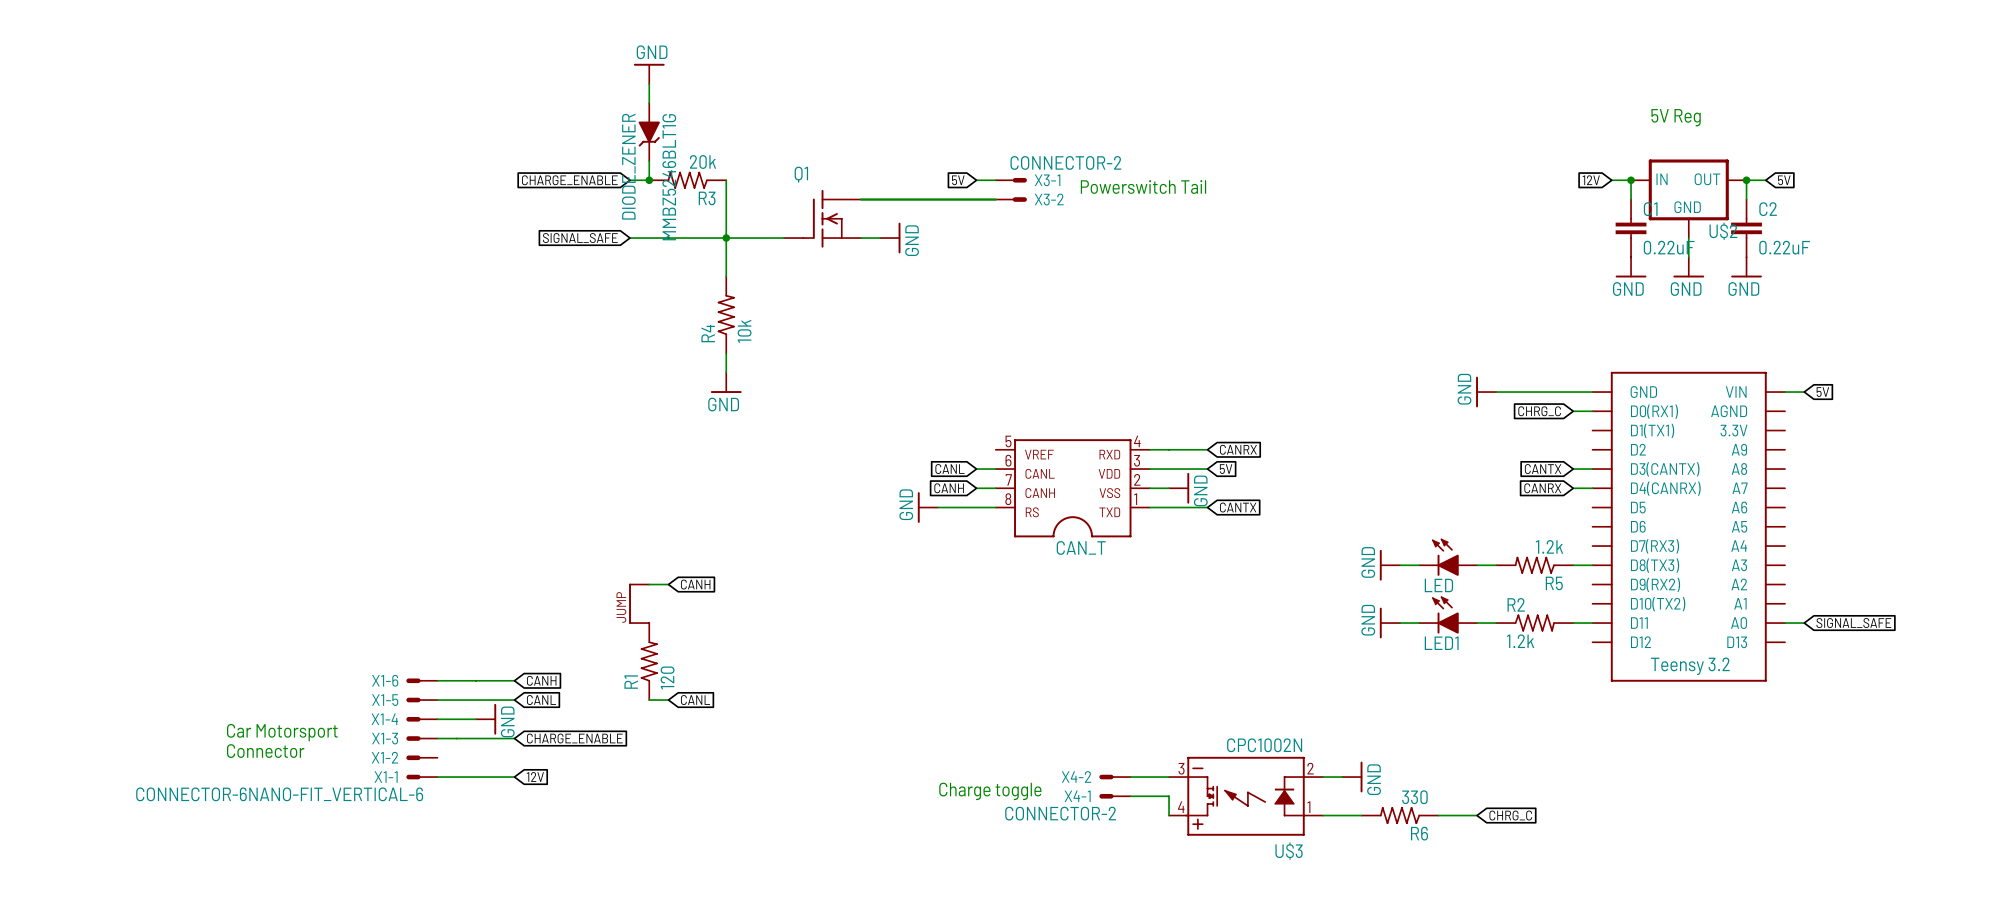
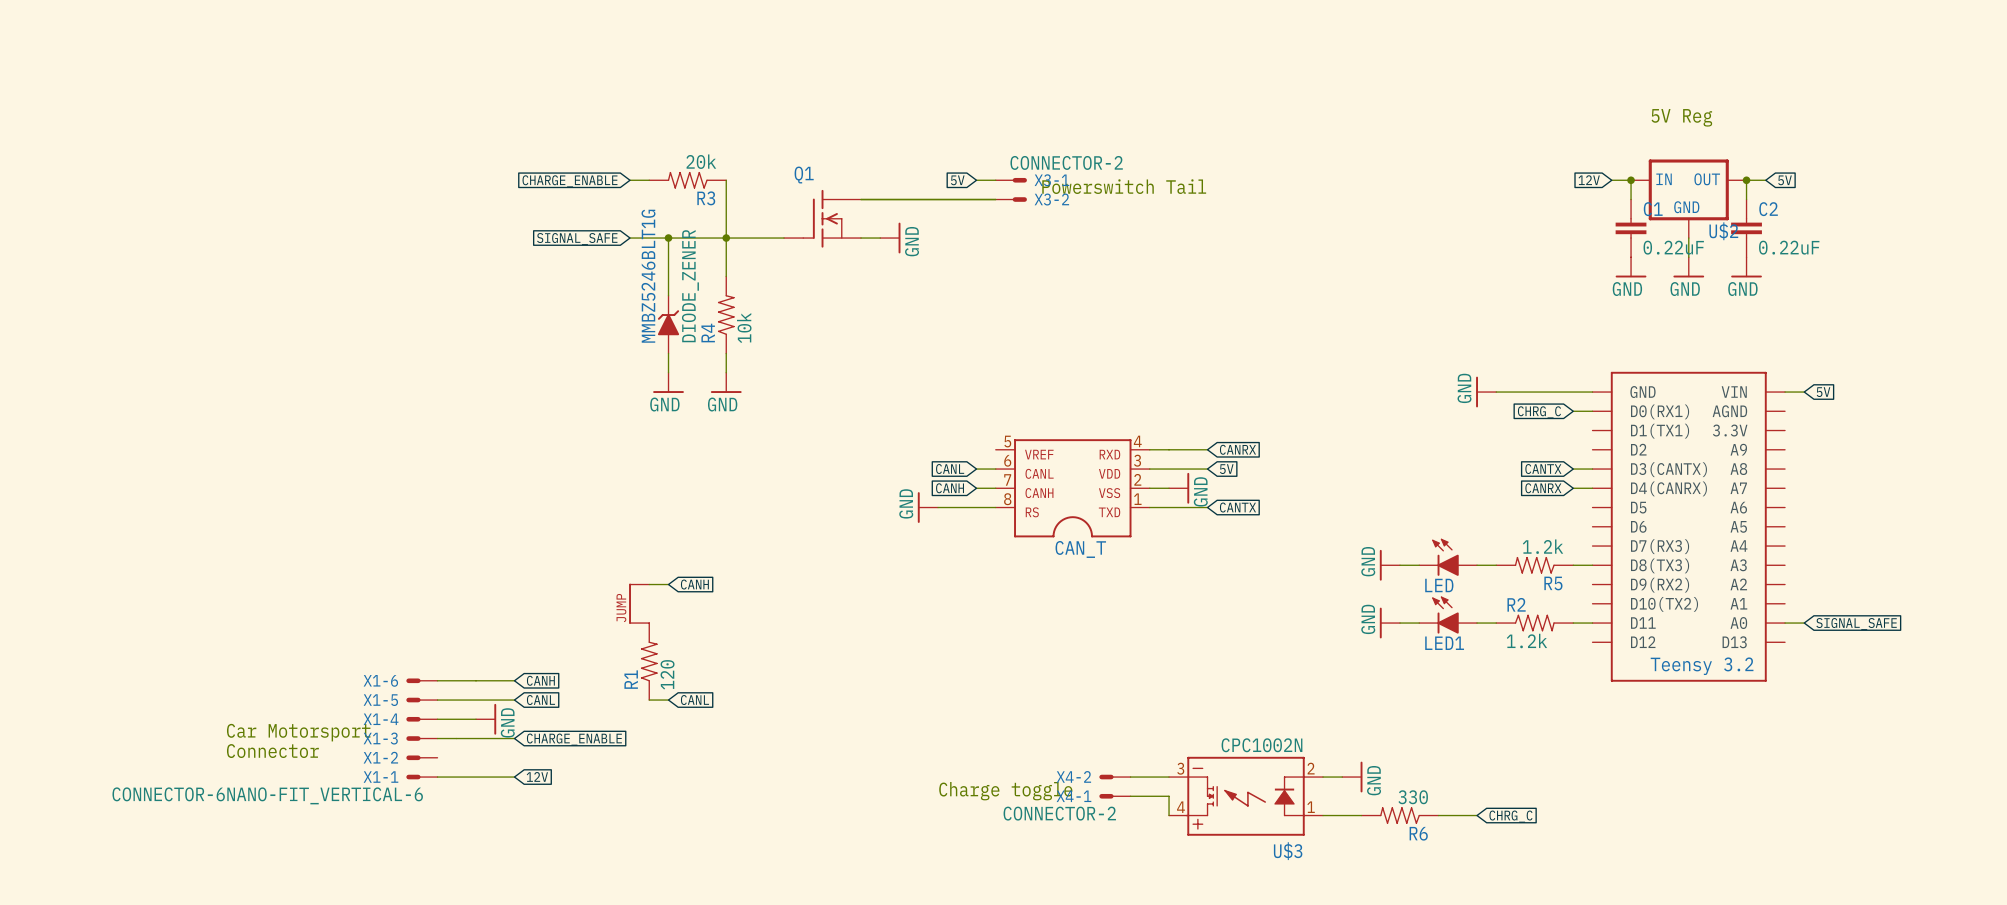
power symbol: GND (649, 73) -> none
wire: (649, 84) (649, 103) -> none
MMBZ5246BLT1G position: (649, 132) -> (668, 324)
MMBZ5246BLT1G rotation: 0° (649, 134) -> 180° (668, 322)
wire: (649, 161) (649, 180) -> none
junction: (649, 180) -> none
wire: none -> (668, 238) (668, 295)
junction: none -> (668, 238)
wire: none -> (668, 353) (668, 372)
power symbol: none -> GND (668, 382)

